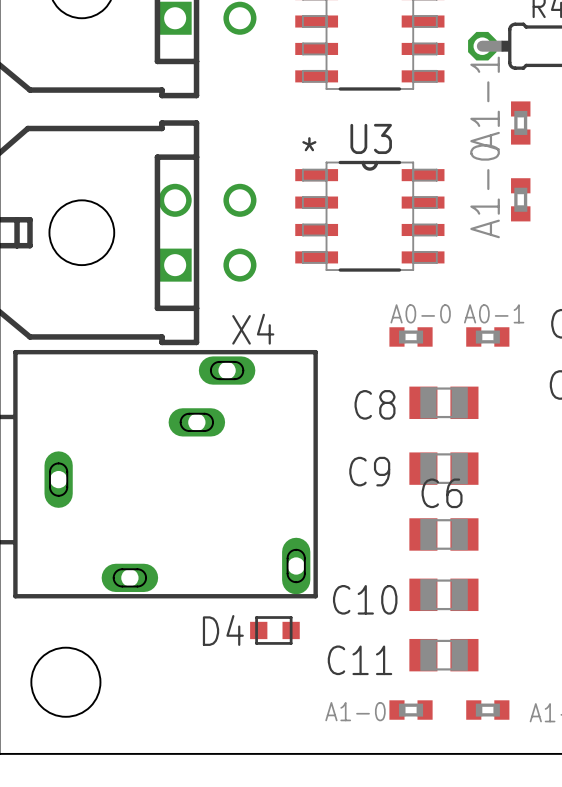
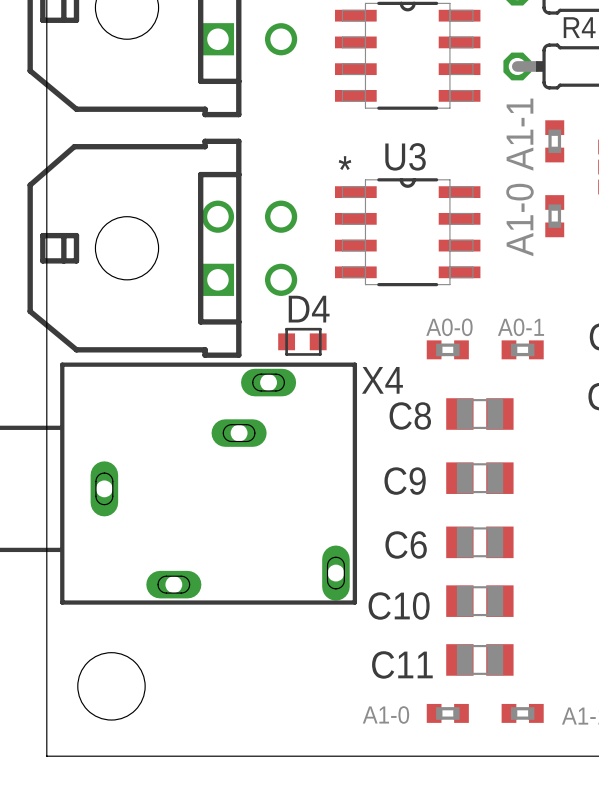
X4 name position: X4 (253, 329) -> X4 (382, 380)
C6 name position: C6 (442, 493) -> C6 (406, 544)
D4 name position: D4 (223, 630) -> D4 (309, 309)
D4 rotation: 0° (274, 630) -> 180° (302, 341)
D4 position: (274, 630) -> (302, 341)

